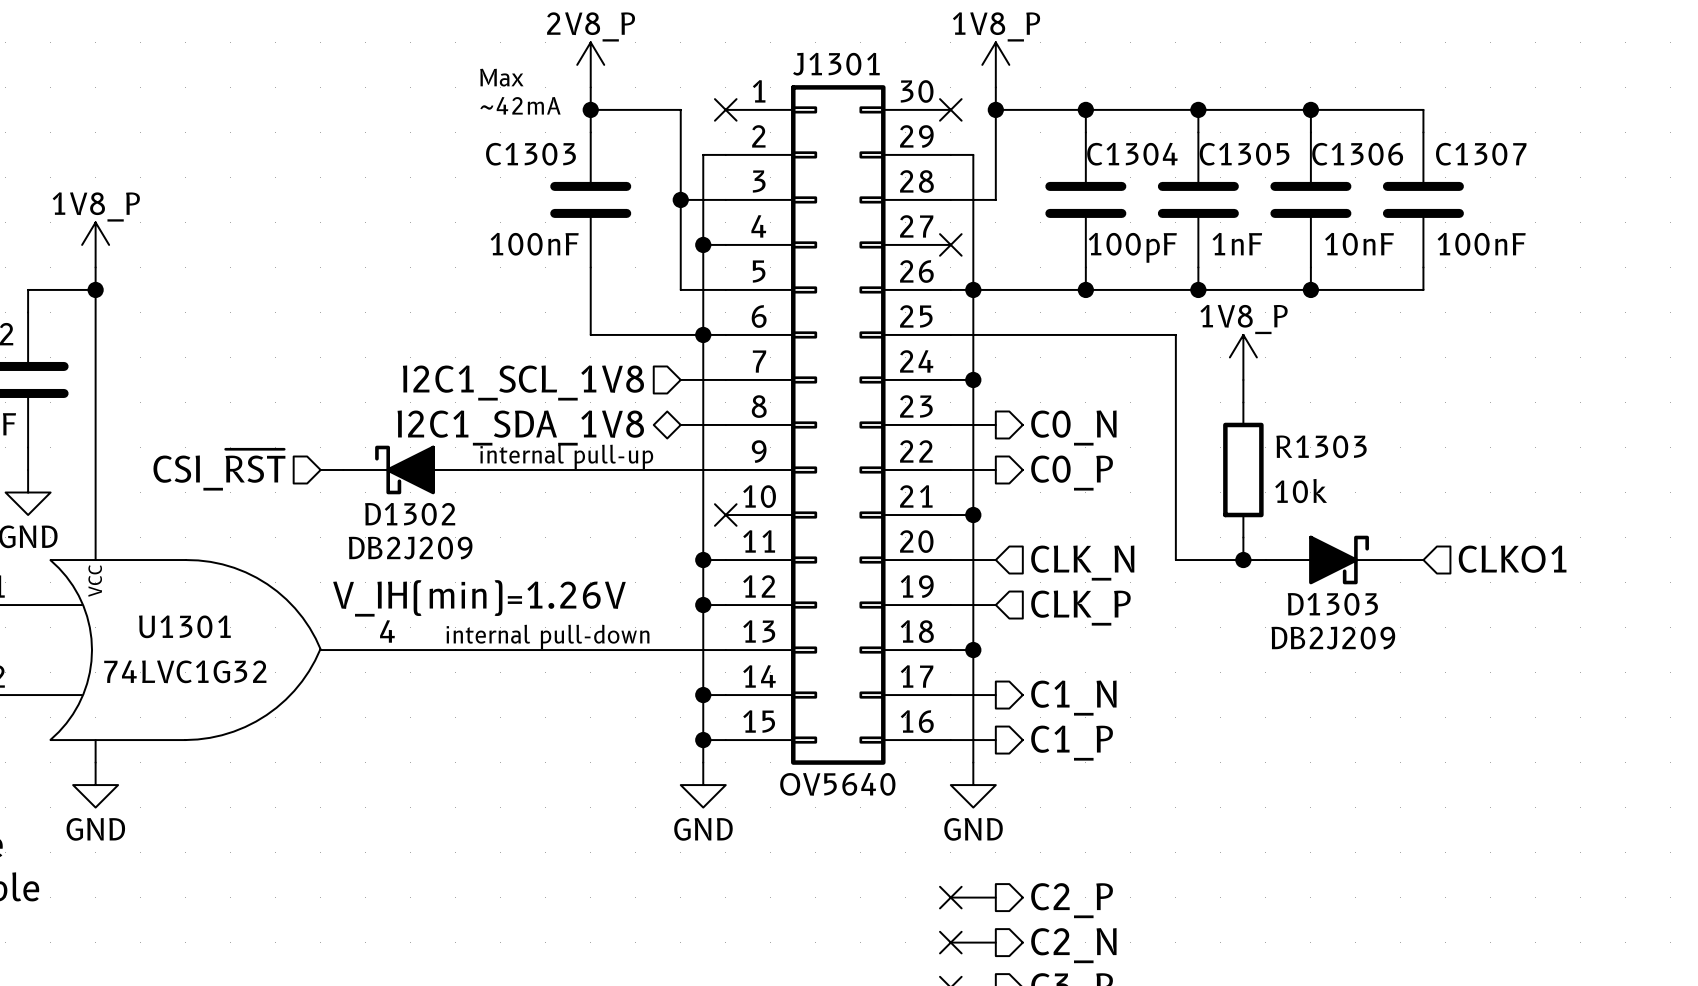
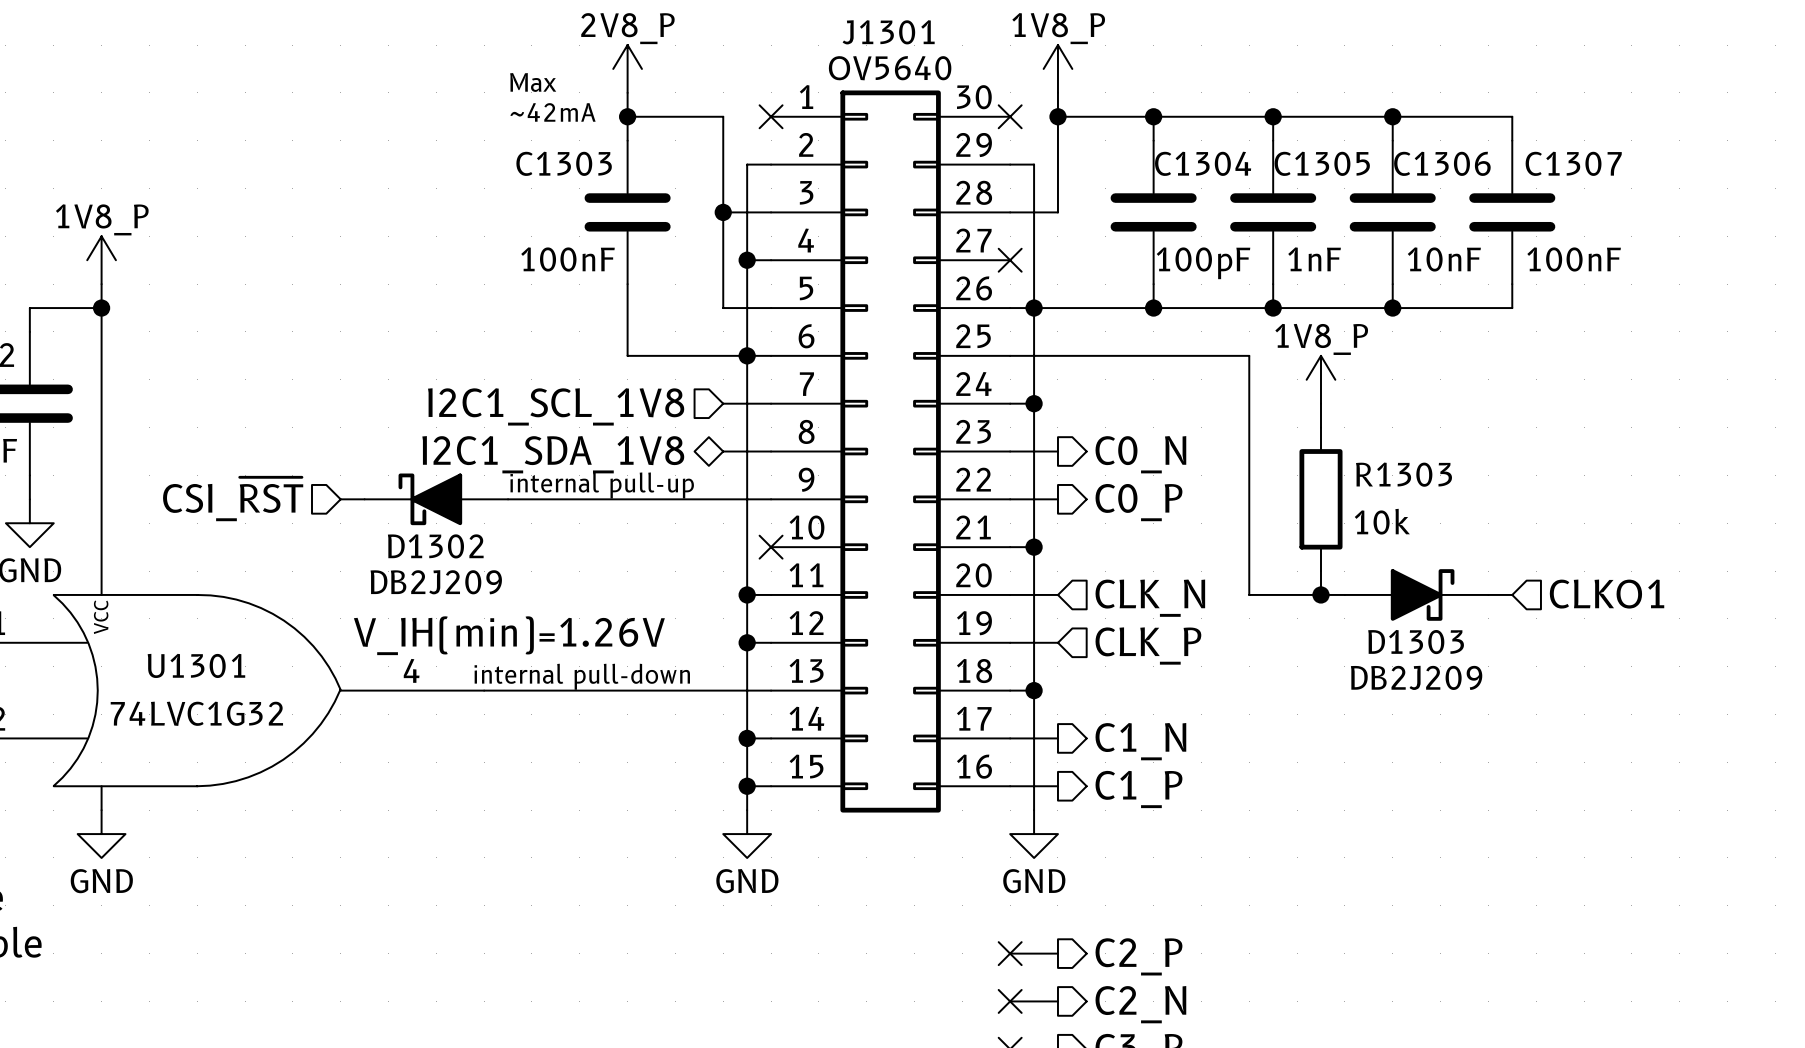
J1301 name position: J1301 (836, 64) -> J1301 (888, 32)
J1301 value position: OV5640 (837, 784) -> OV5640 (890, 68)

